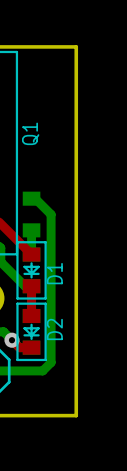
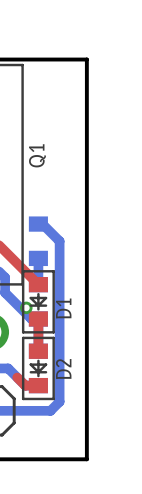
via: none -> (26, 307)
via: (12, 340) -> none

